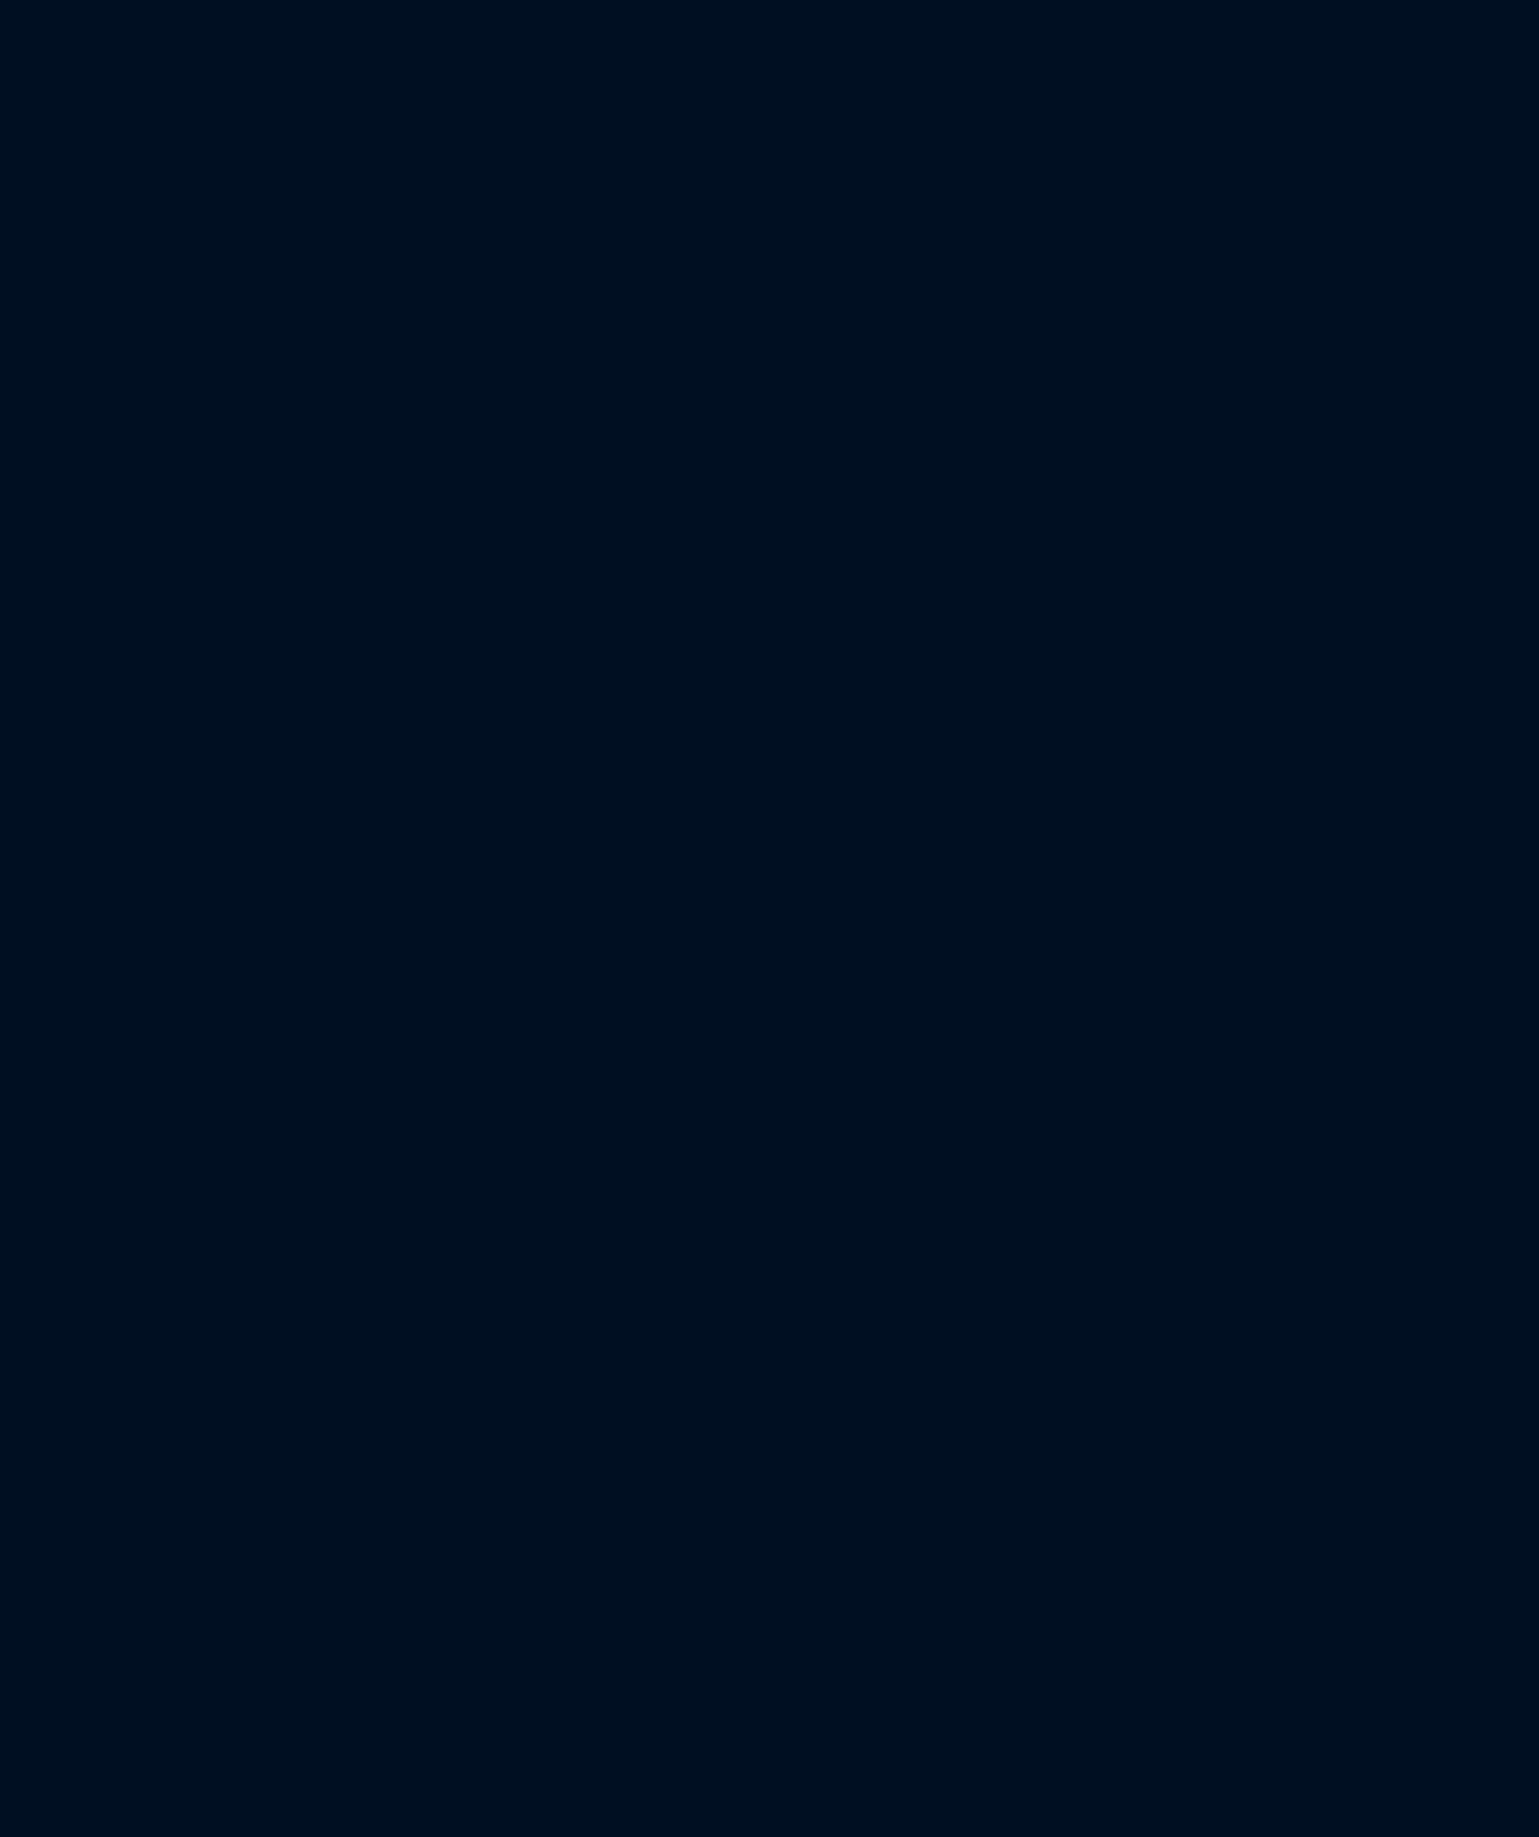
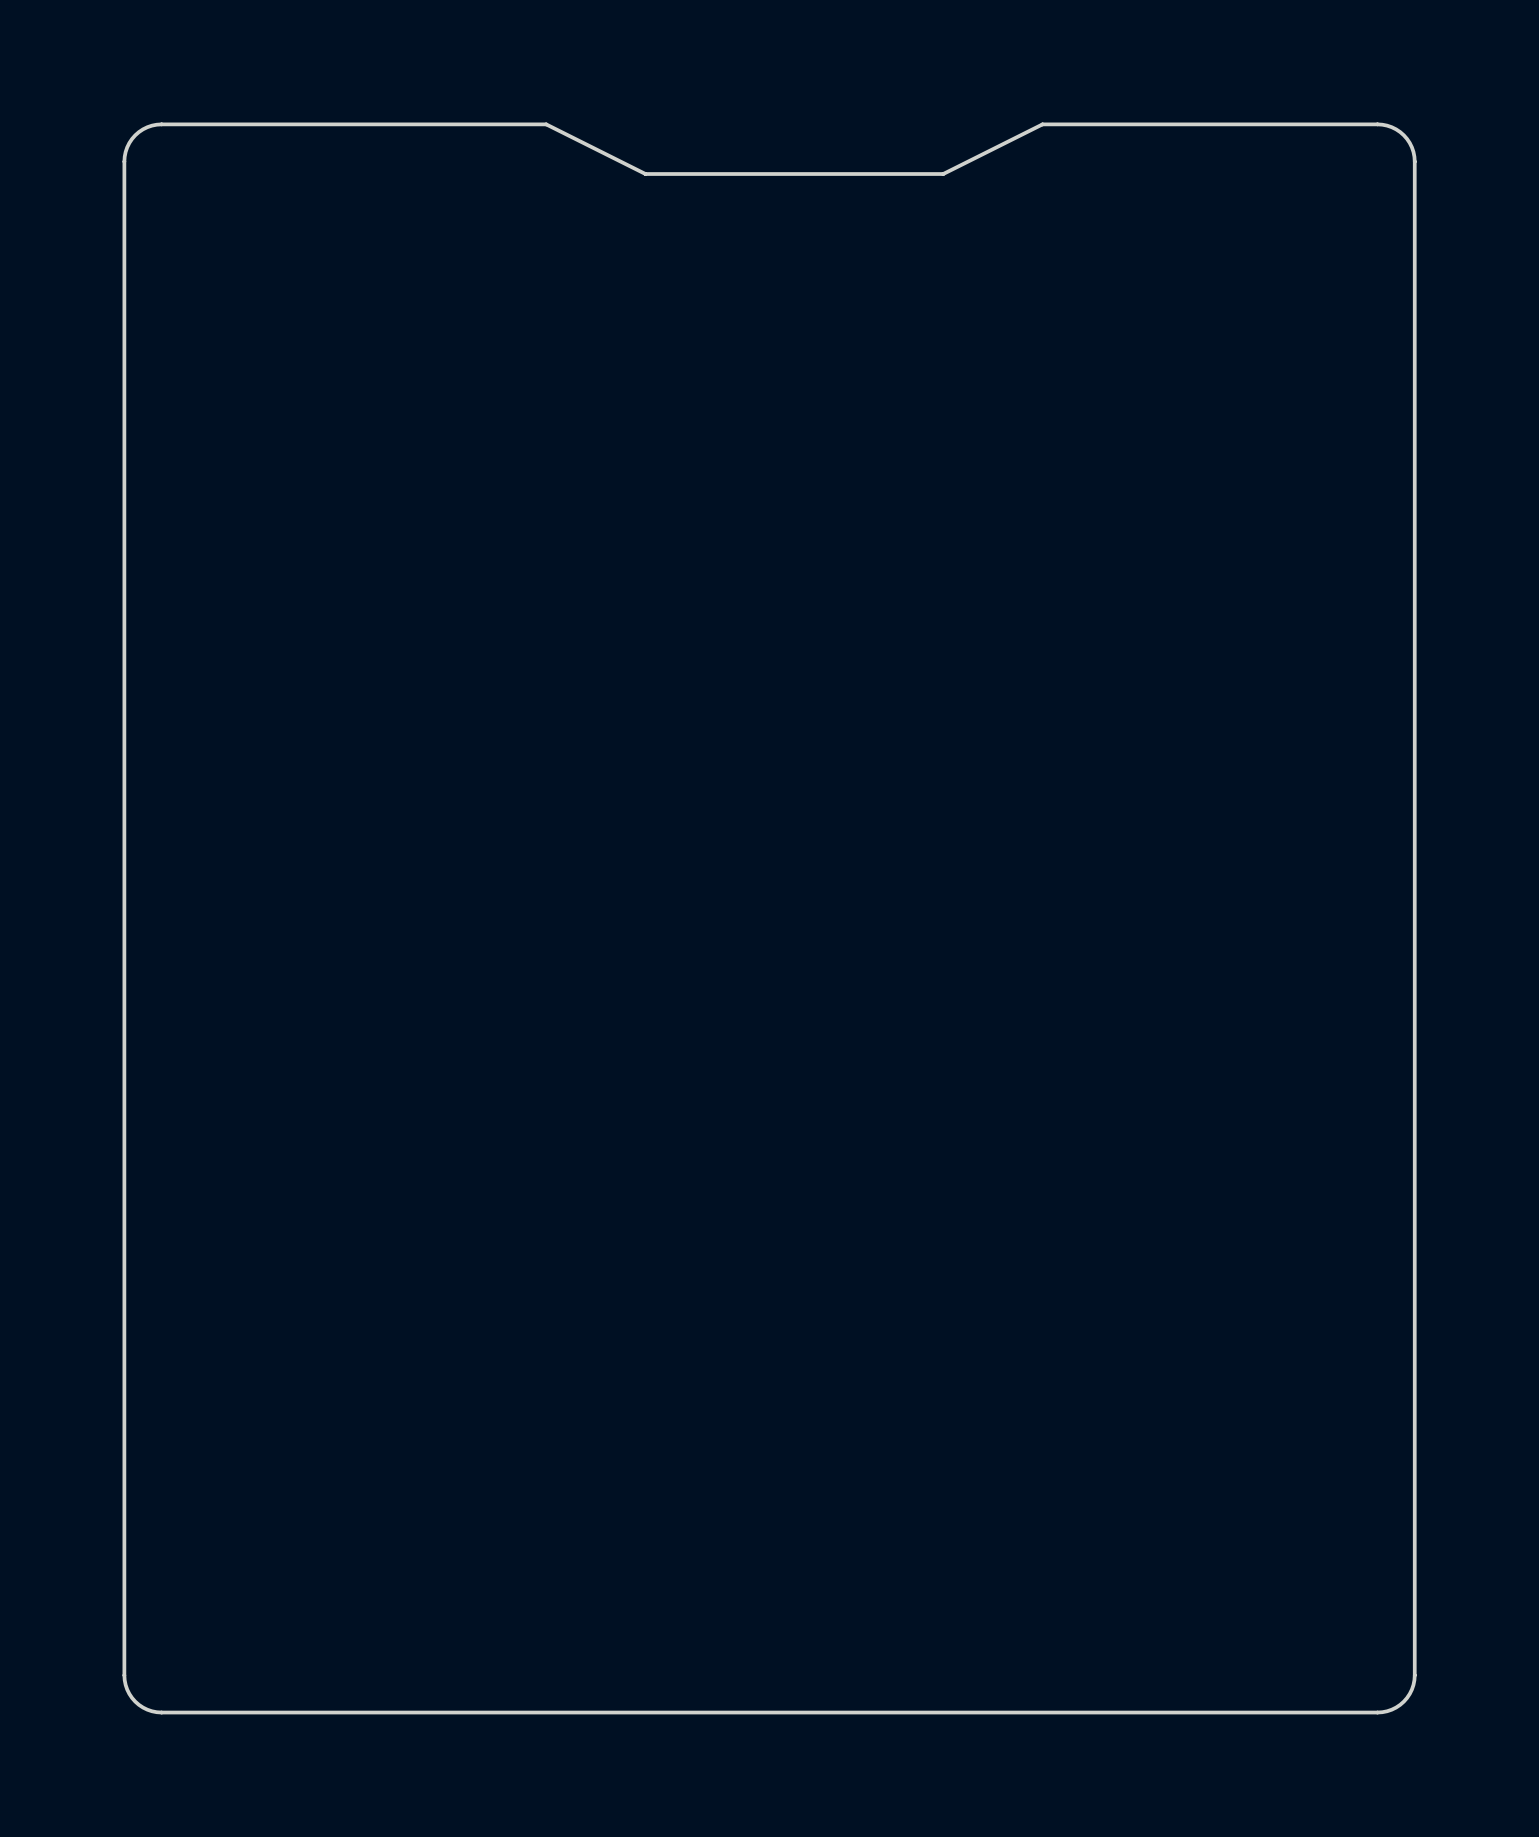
board edge: none -> (1377, 124) (1042, 124) (943, 174) (645, 174) (546, 124) (161, 124) (147, 127) (132, 138) (125, 151) (124, 161) (124, 1675) (127, 1689) (138, 1704) (147, 1709) (161, 1712) (1377, 1712) (1391, 1709) (1407, 1697) (1411, 1689) (1414, 1675) (1414, 161) (1411, 147) (1403, 135) (1391, 127) (1377, 124)

